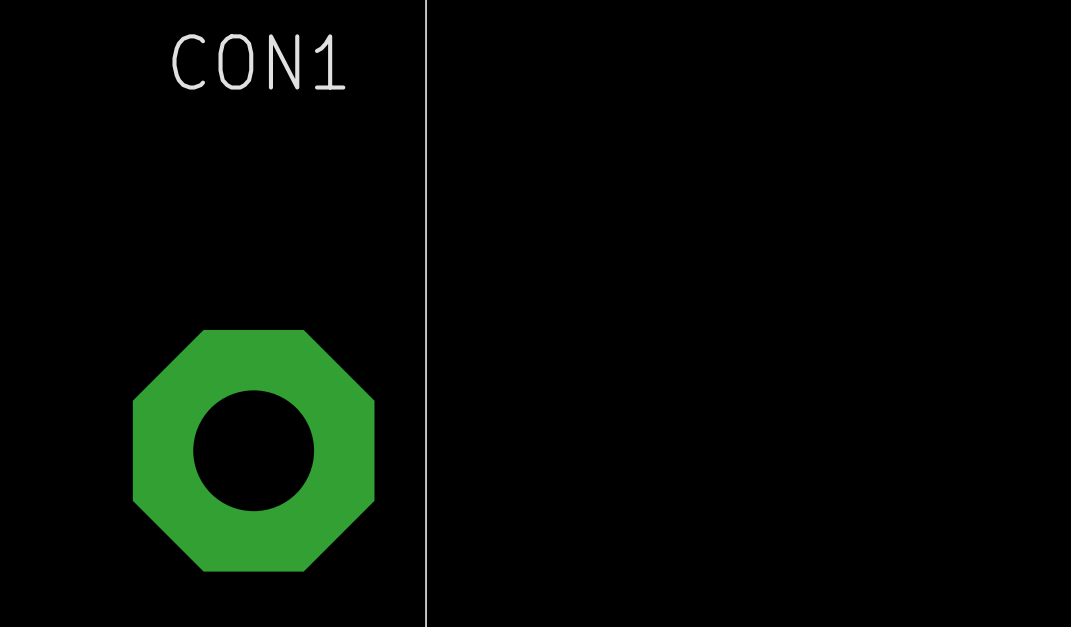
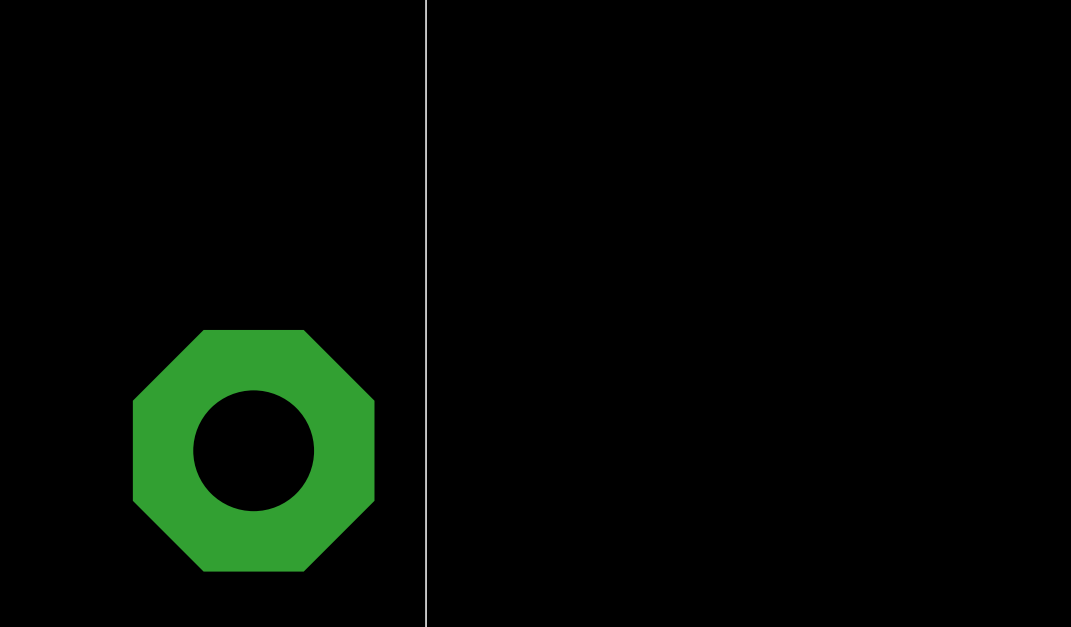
CON1 name: CON1 (258, 61) -> none

